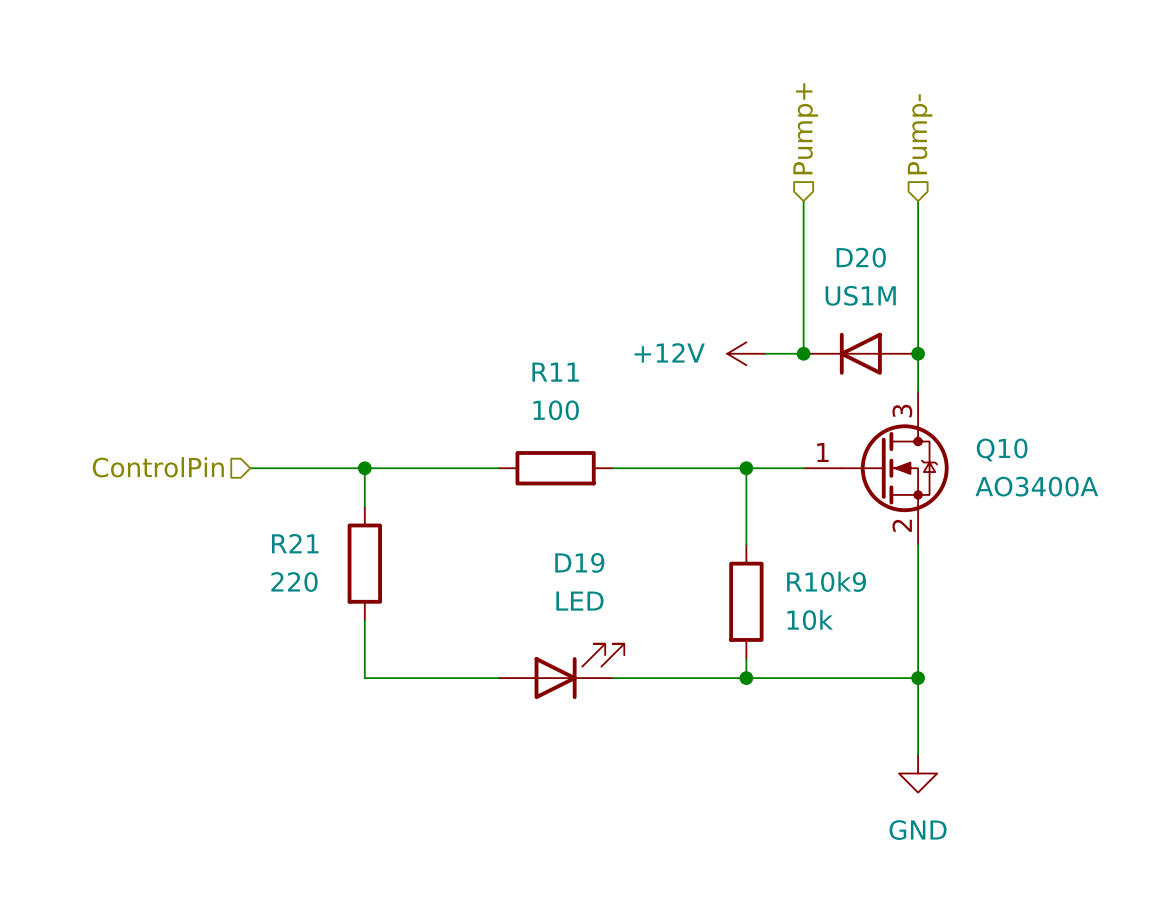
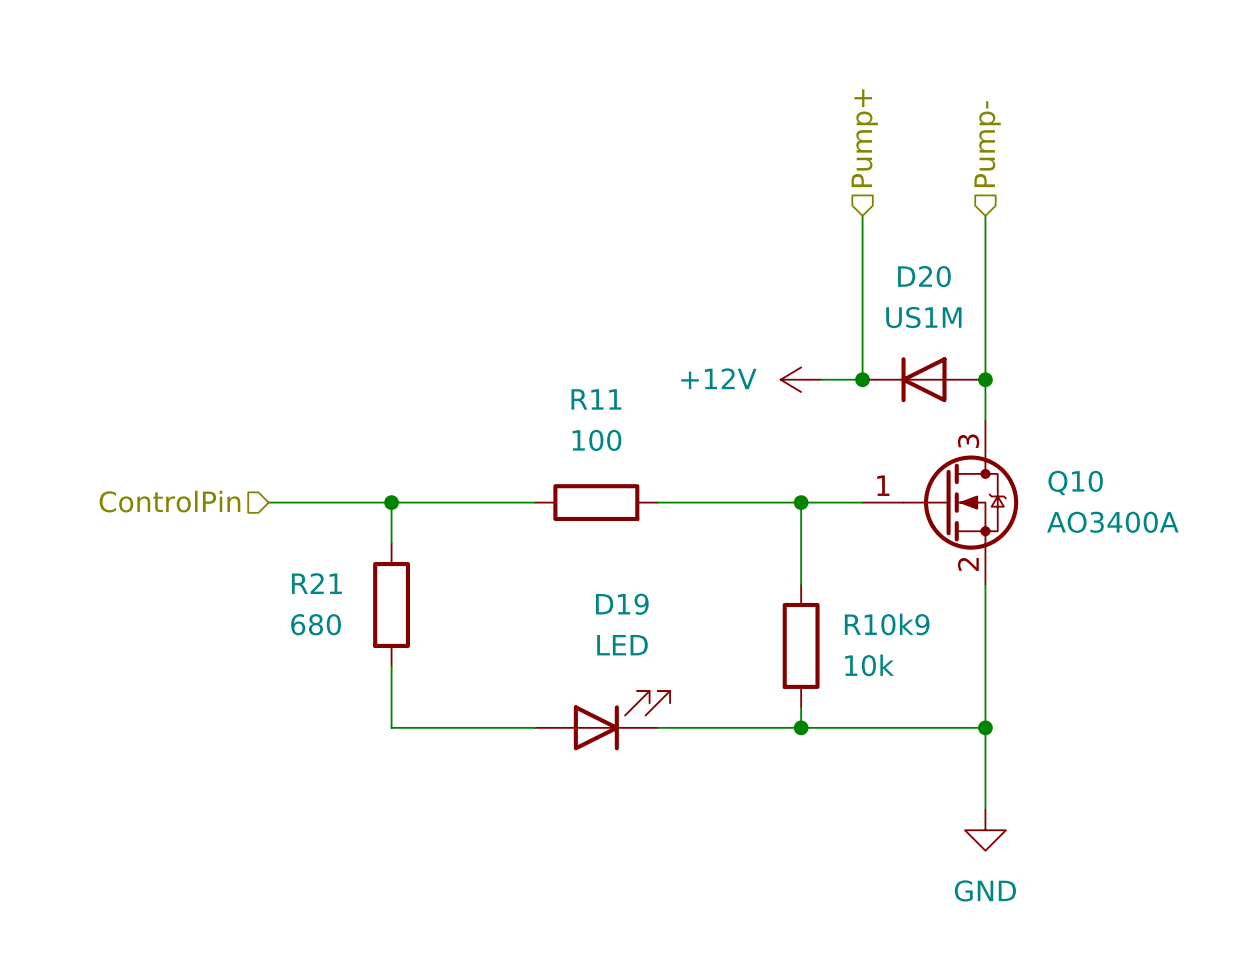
R21 value: 220 (294, 582) -> 680 (316, 624)

